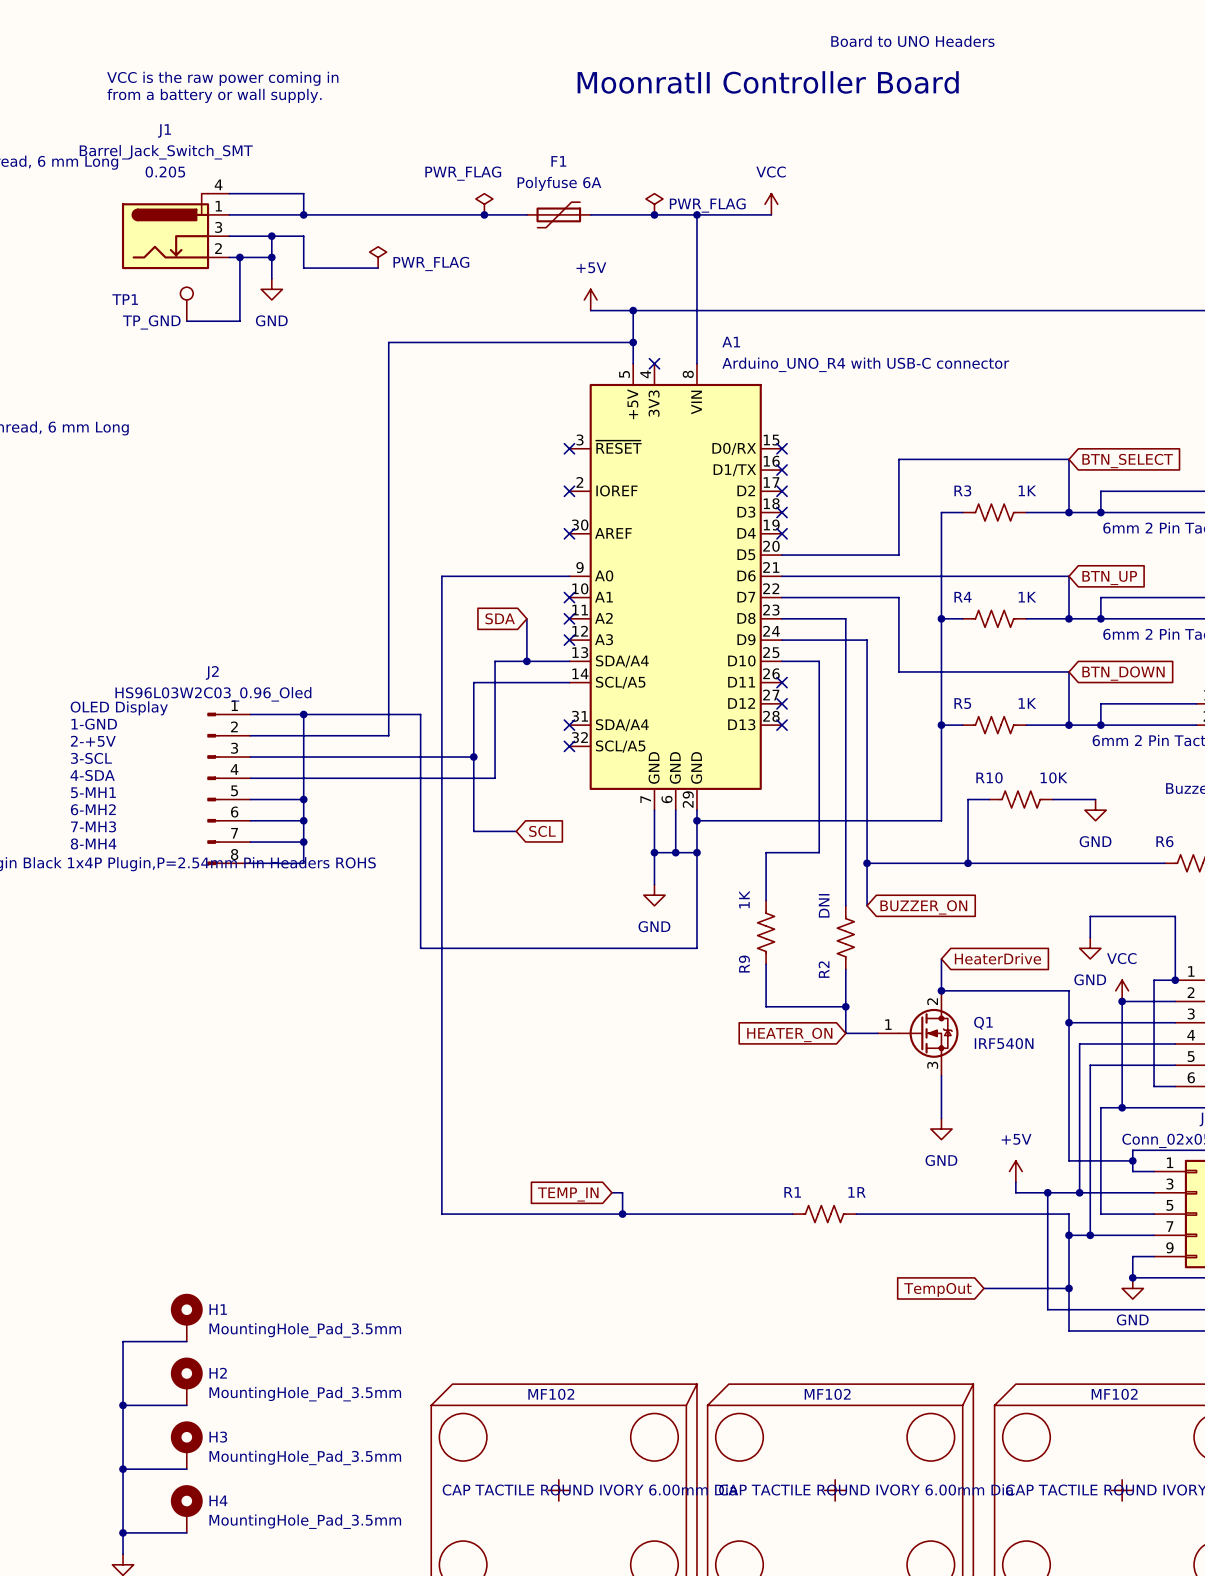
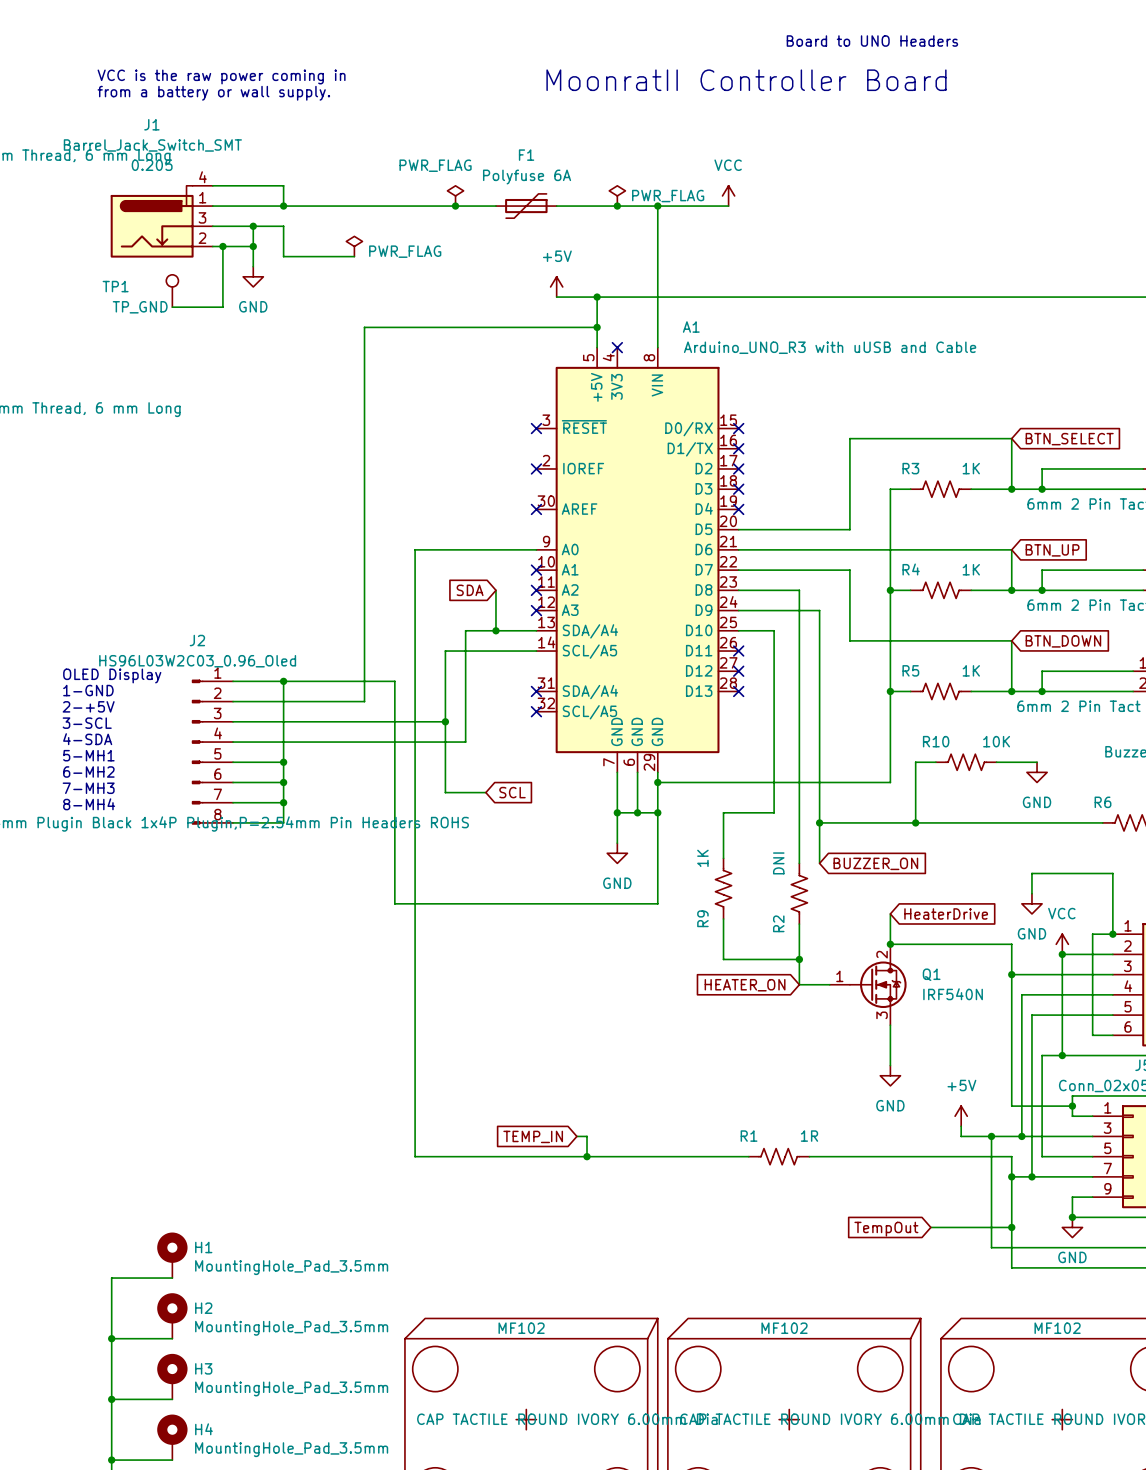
A1 value: Arduino_UNO_R4 with USB-C connector (865, 364) -> Arduino_UNO_R3 with uUSB and Cable (830, 347)

